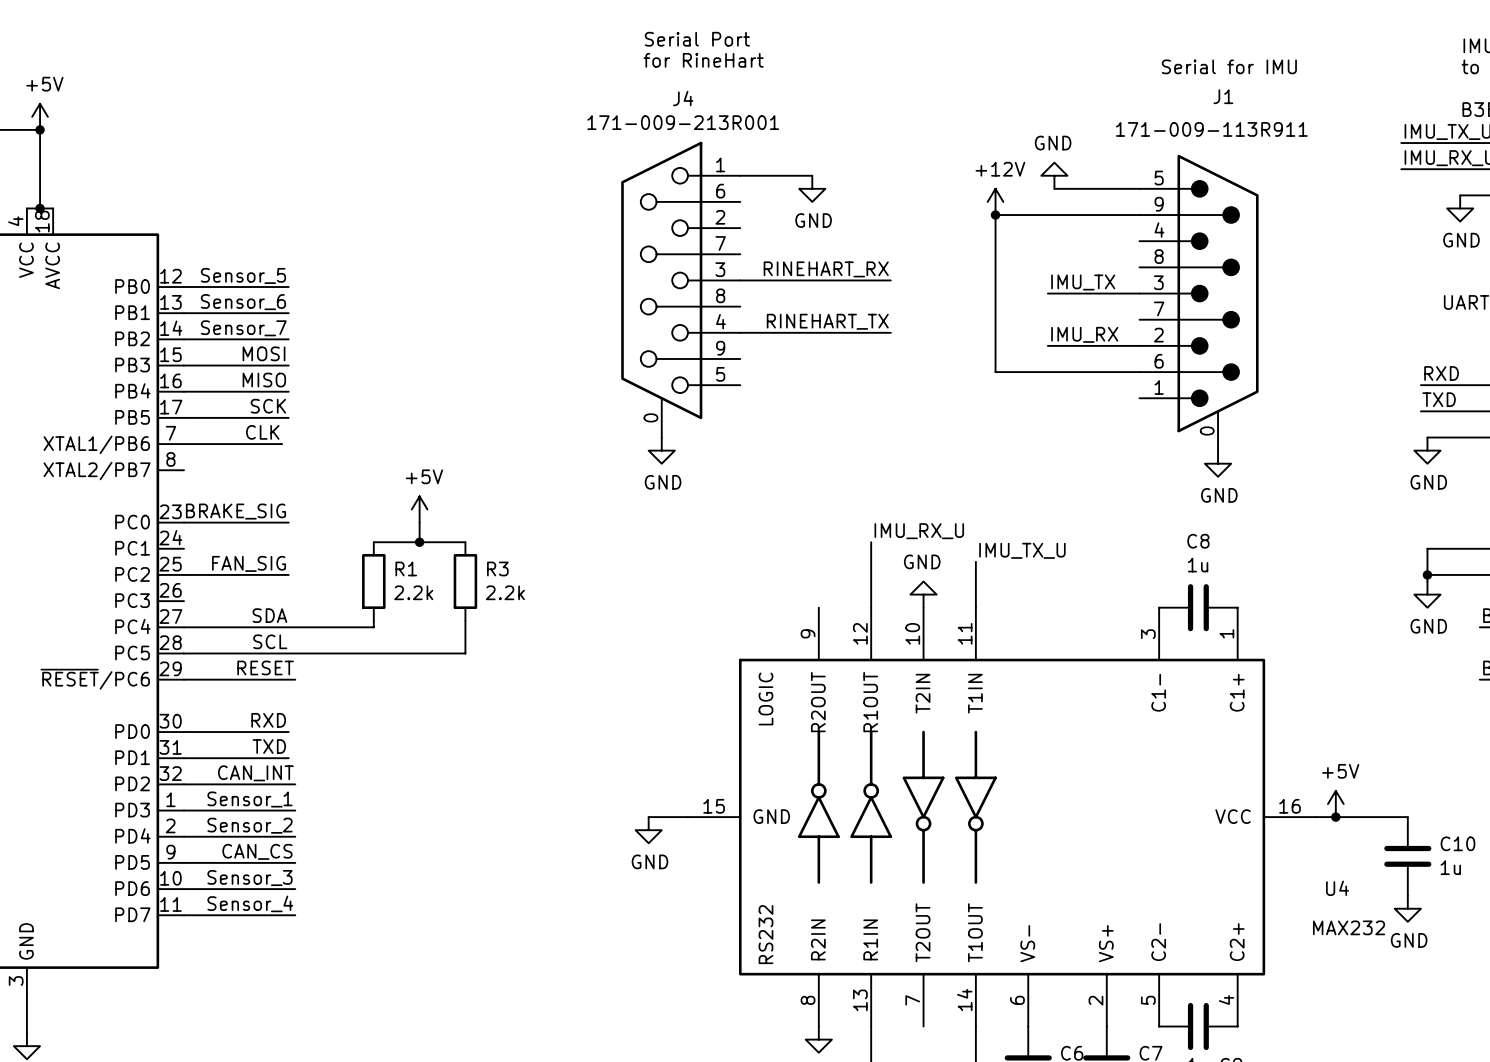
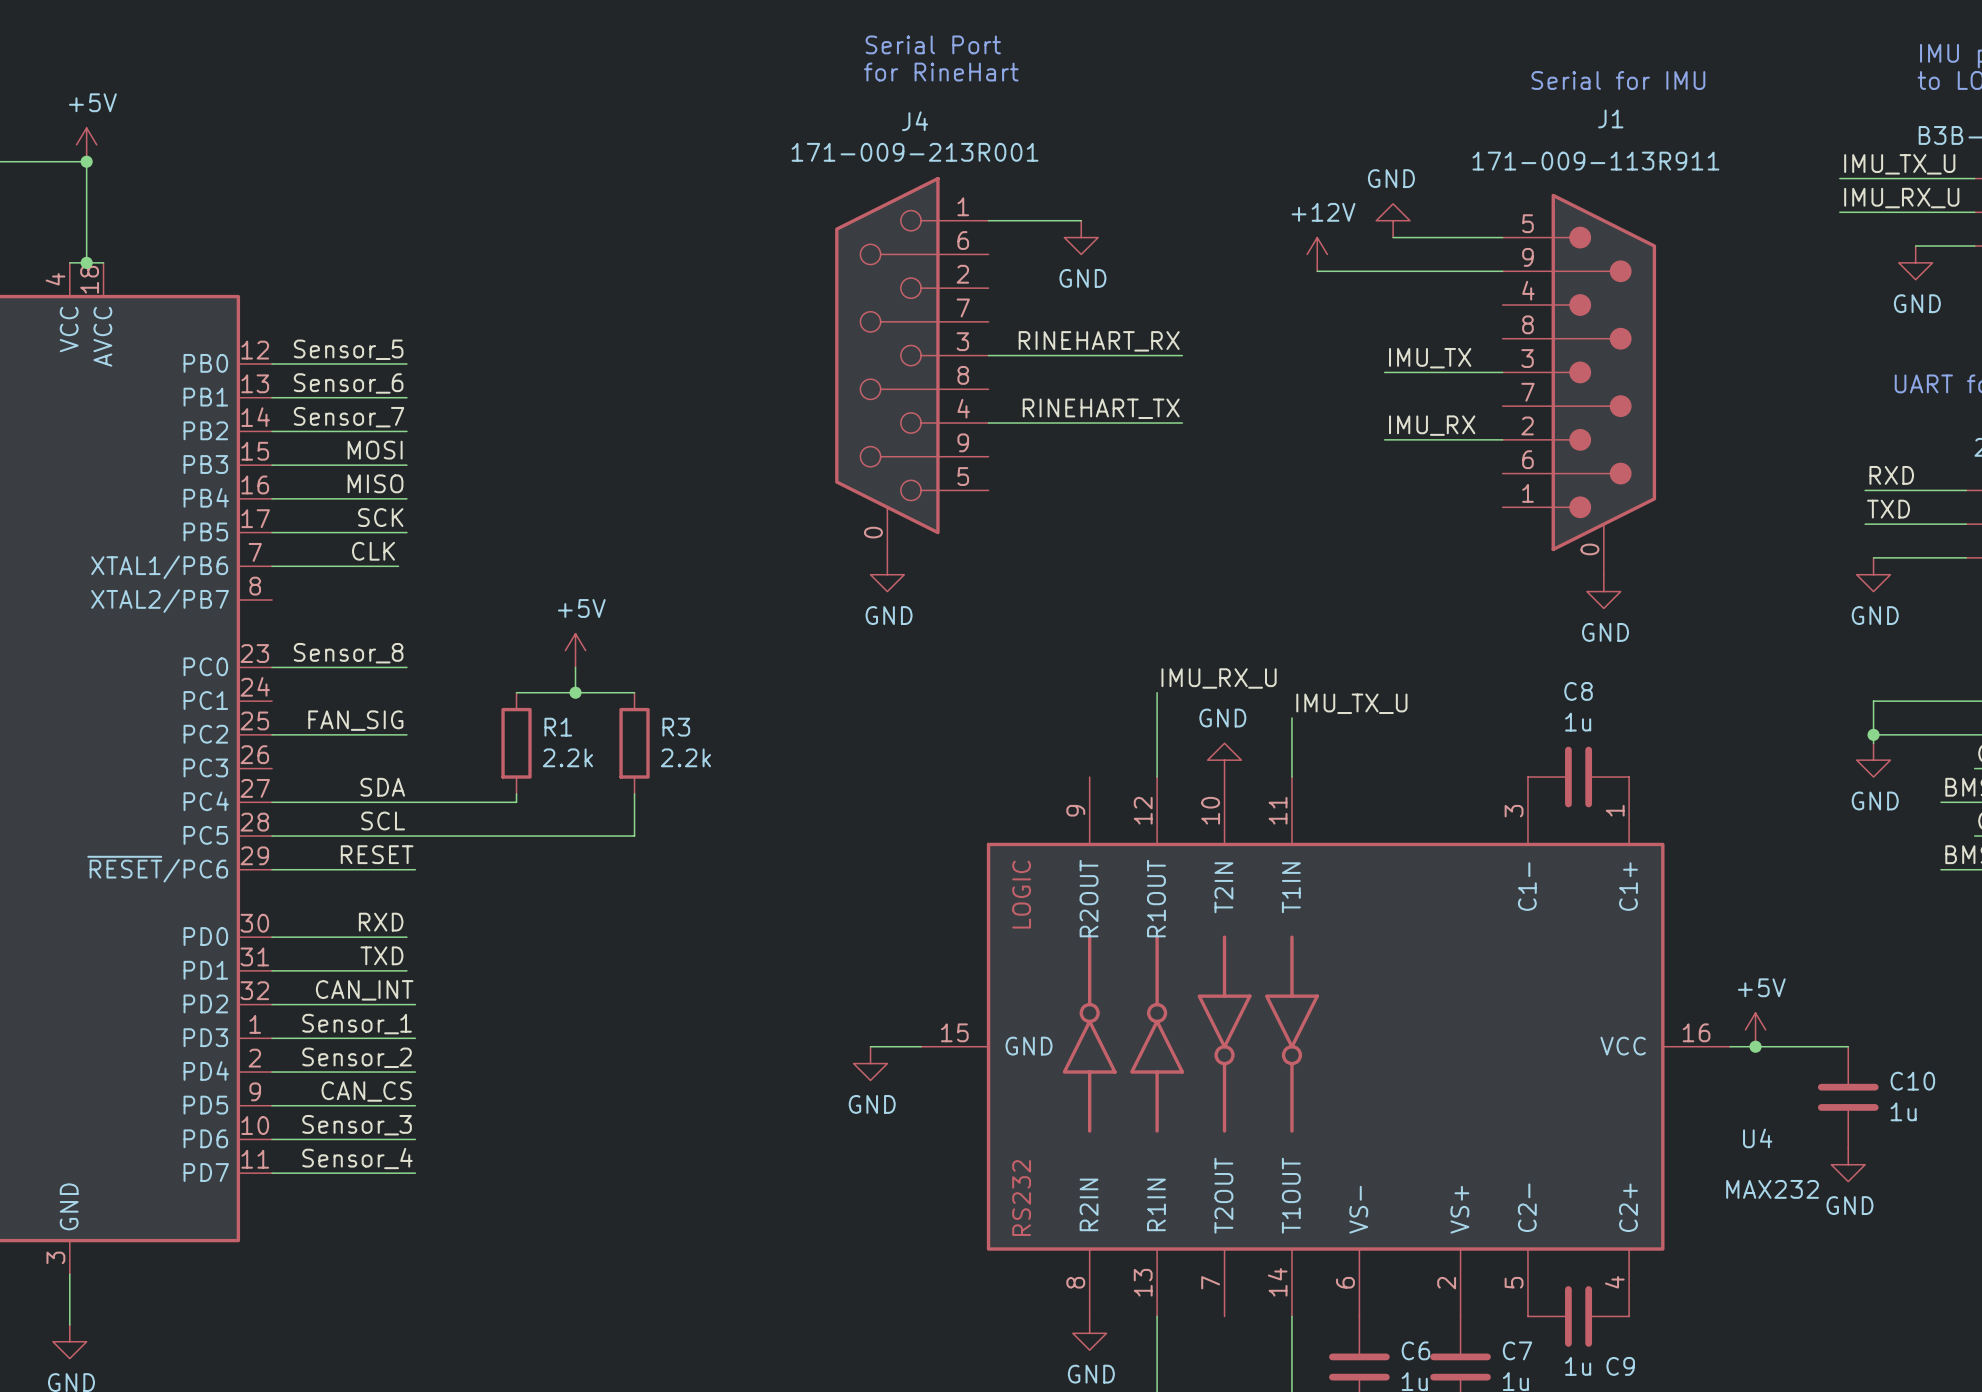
wire: (995, 215) (995, 372) (1139, 372) -> none
junction: (995, 215) -> none
label: BRAKE_SIG (235, 511) -> Sensor_8 (348, 653)

